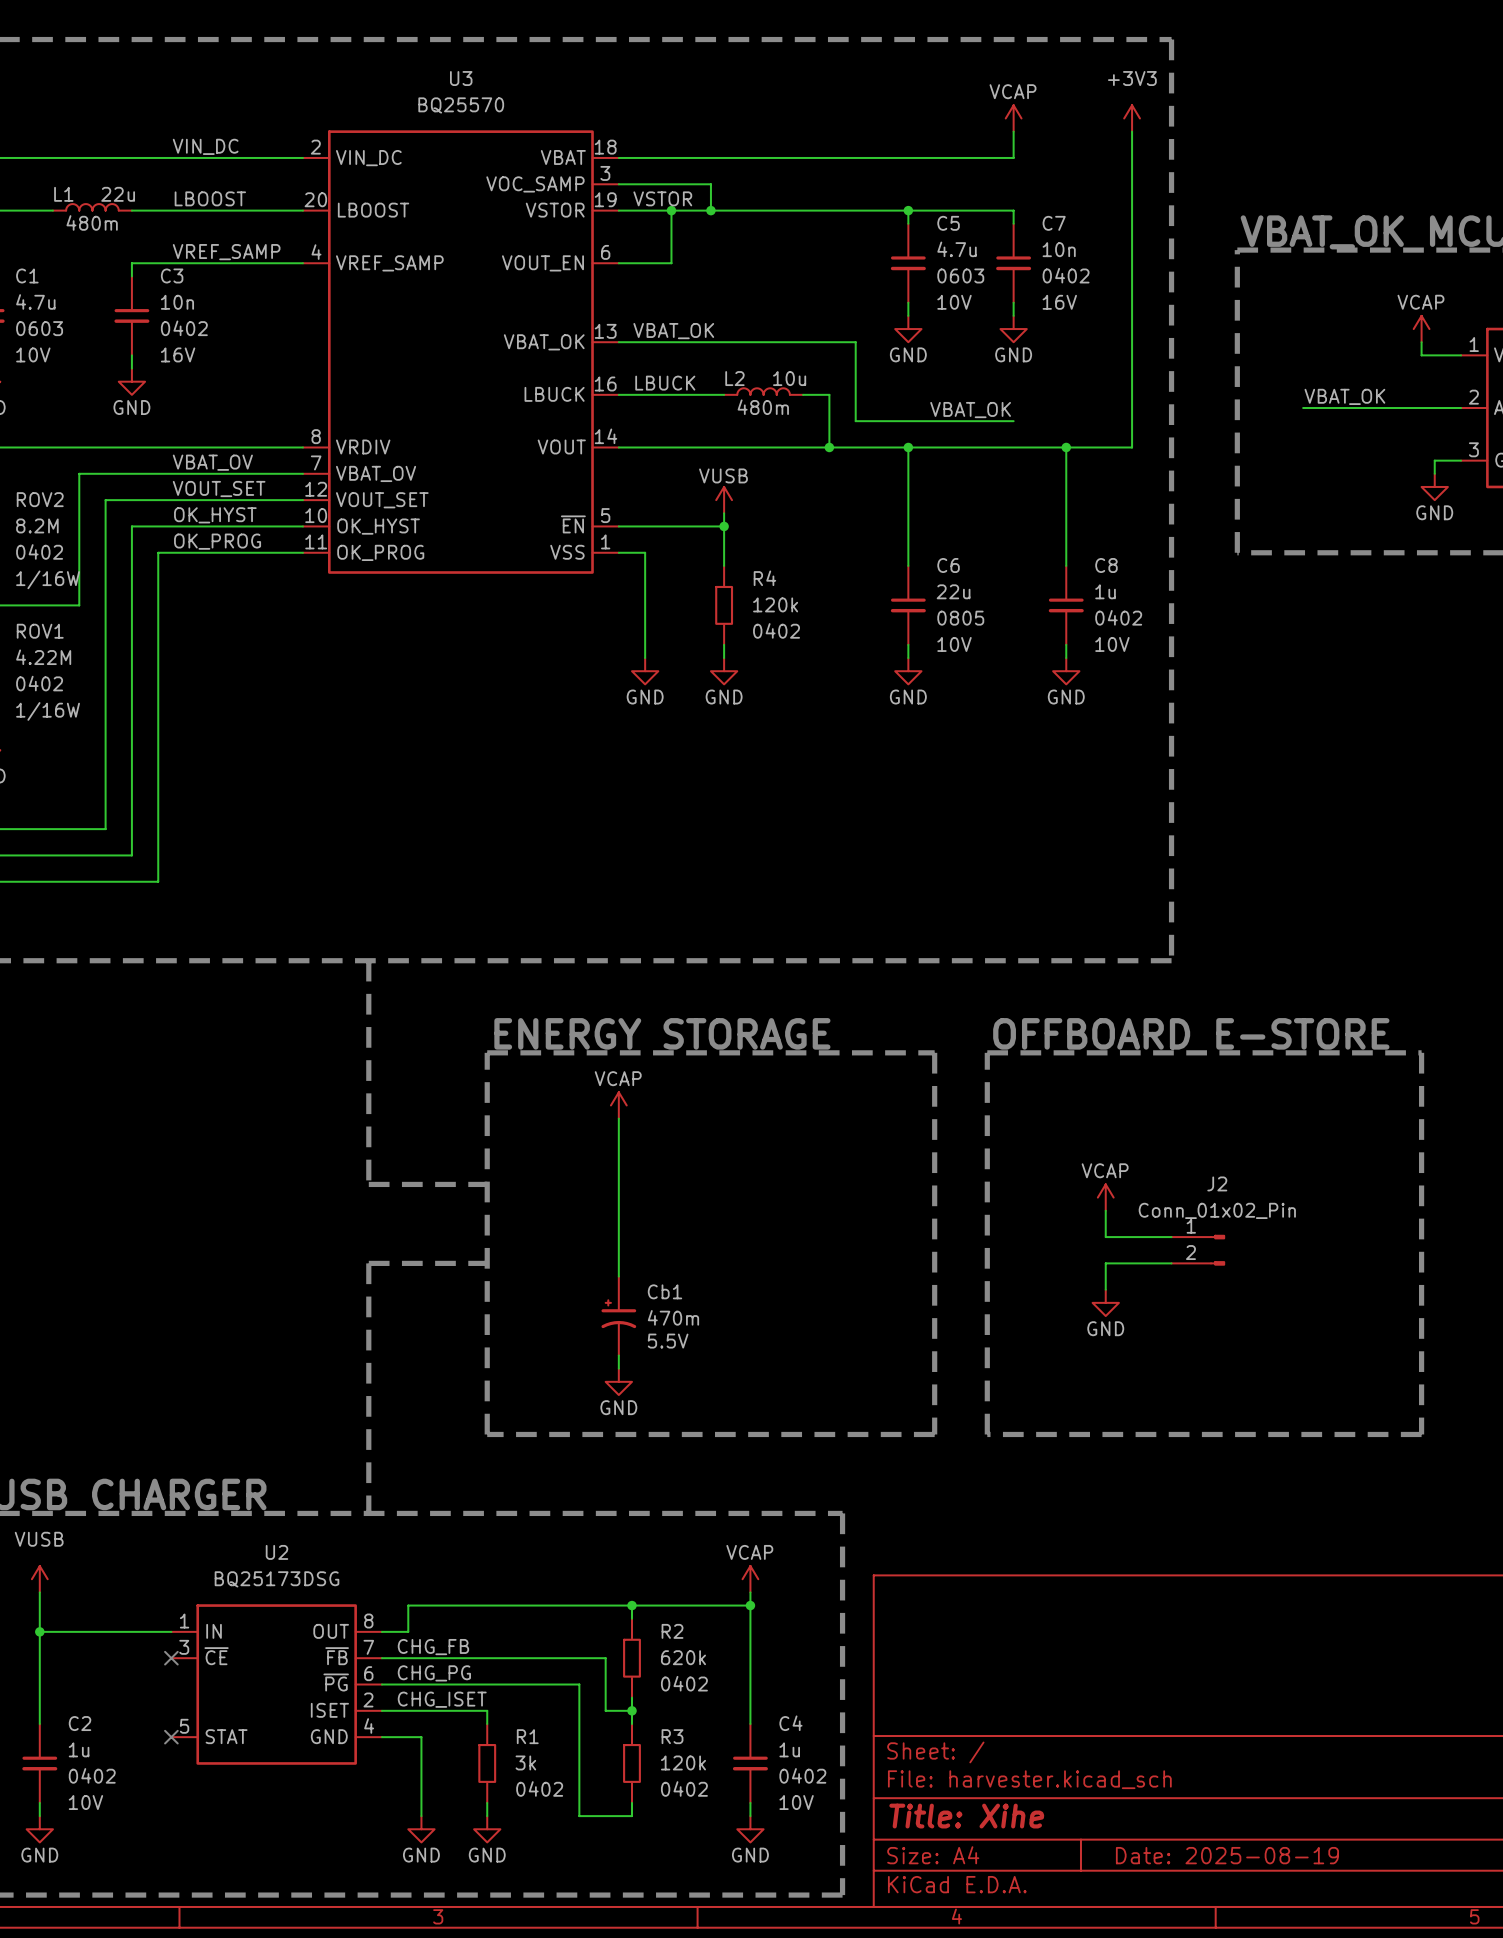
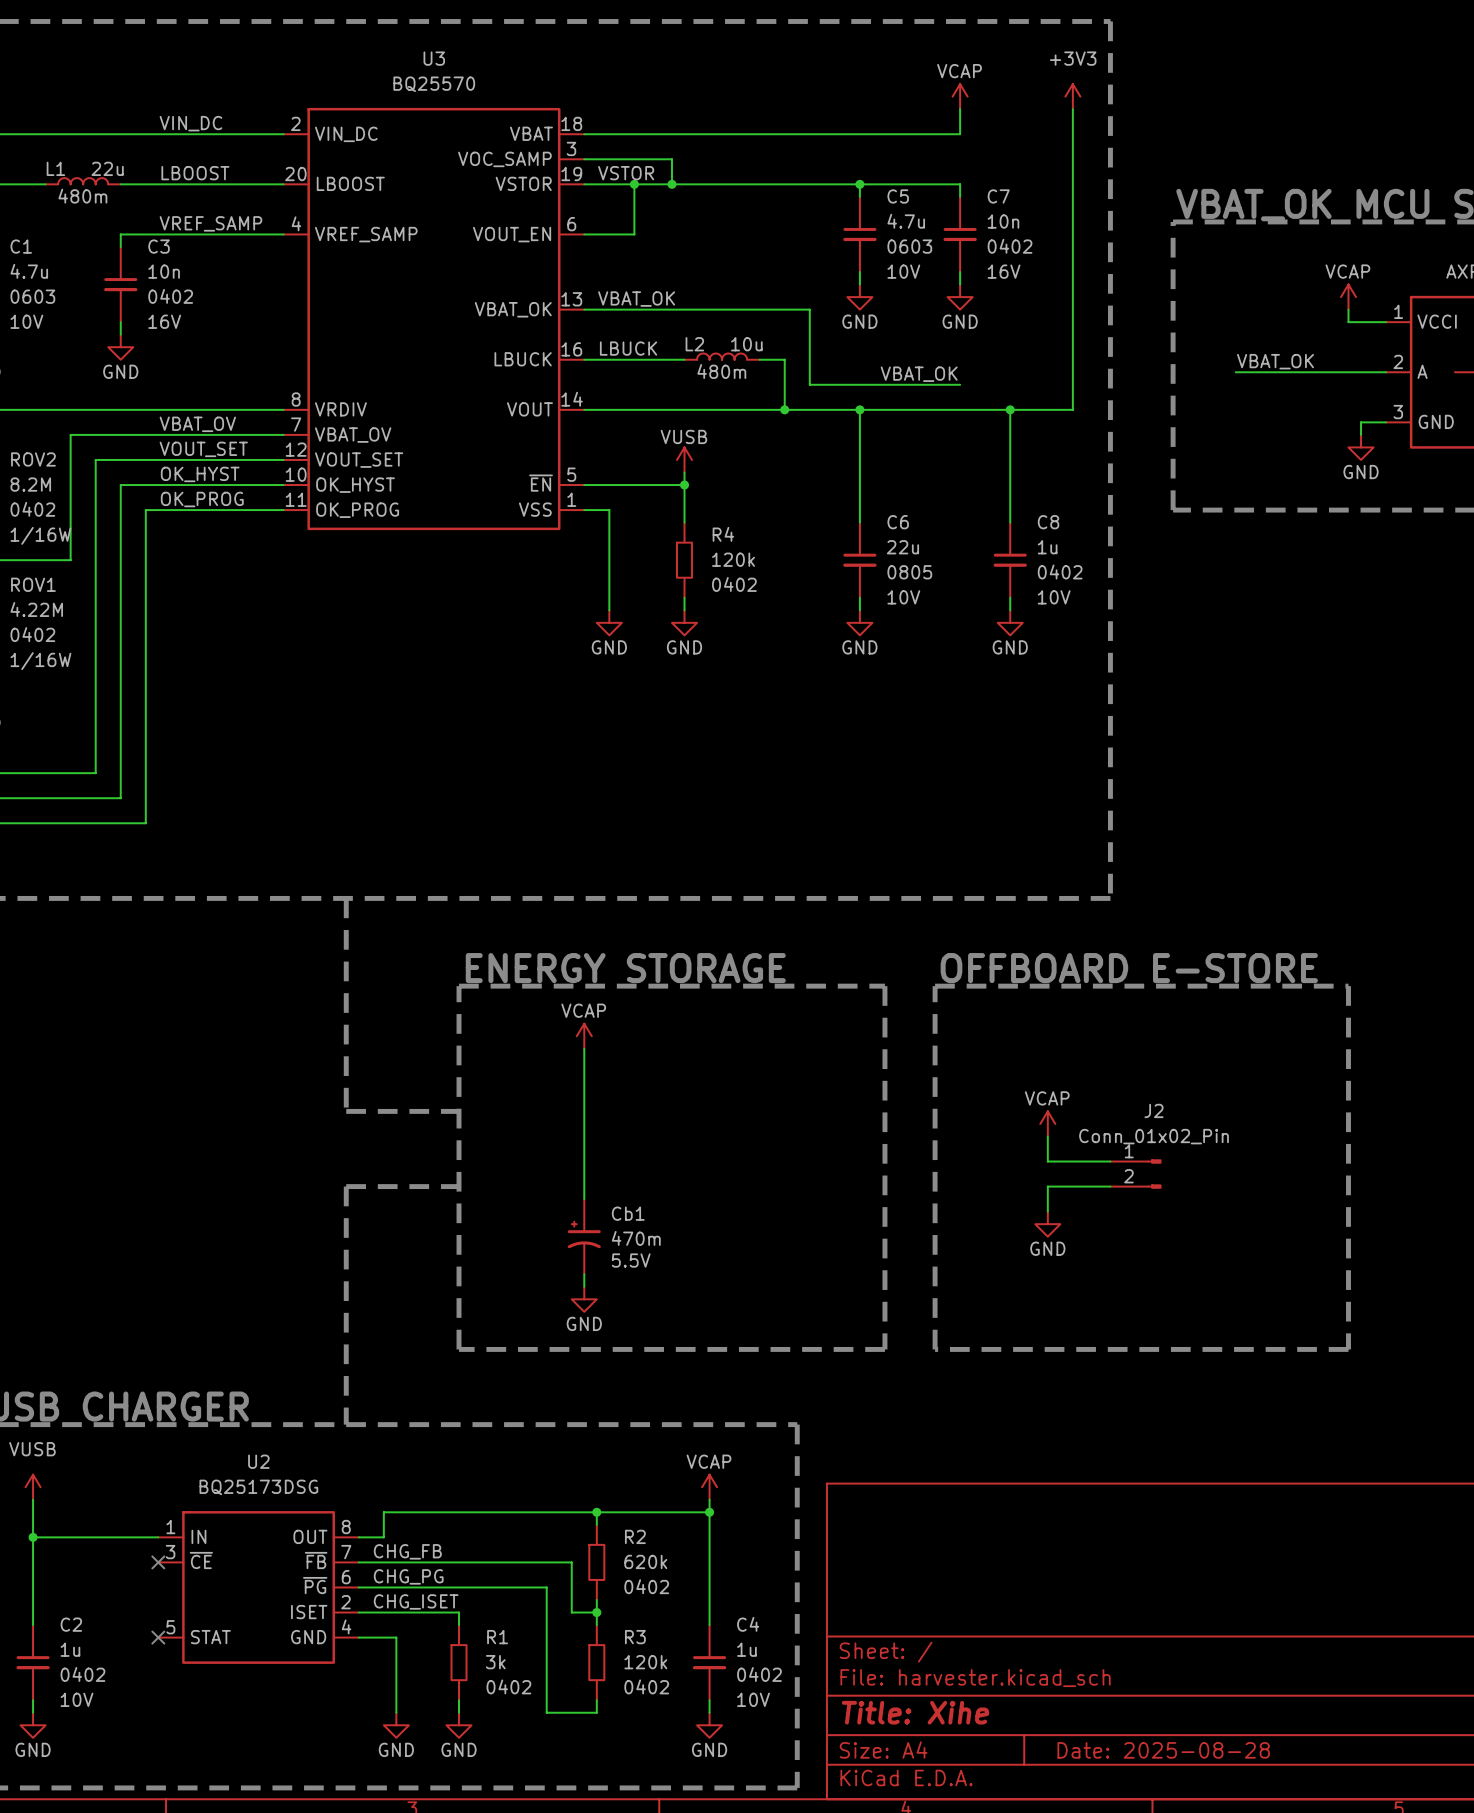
title block: Date: 2025-08-19 (1227, 1855) -> Date: 2025-08-28 (1163, 1750)

